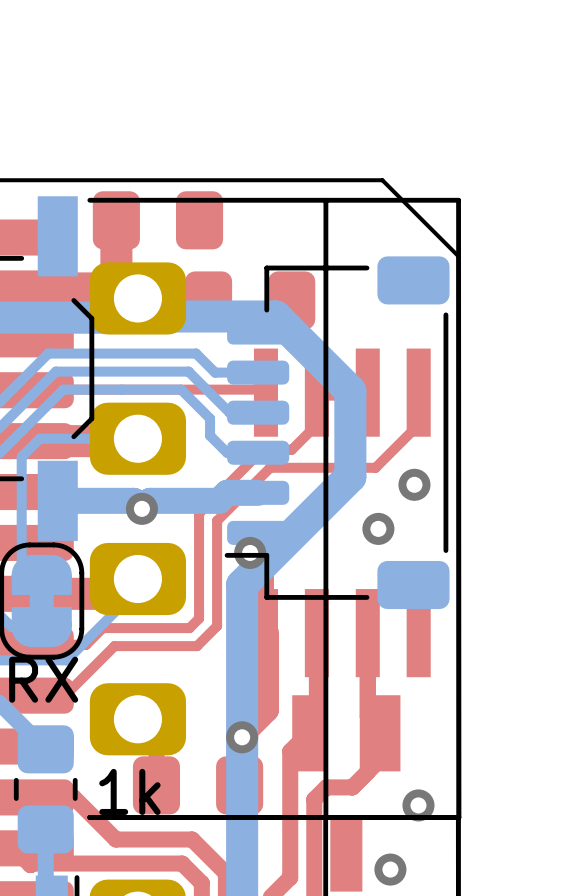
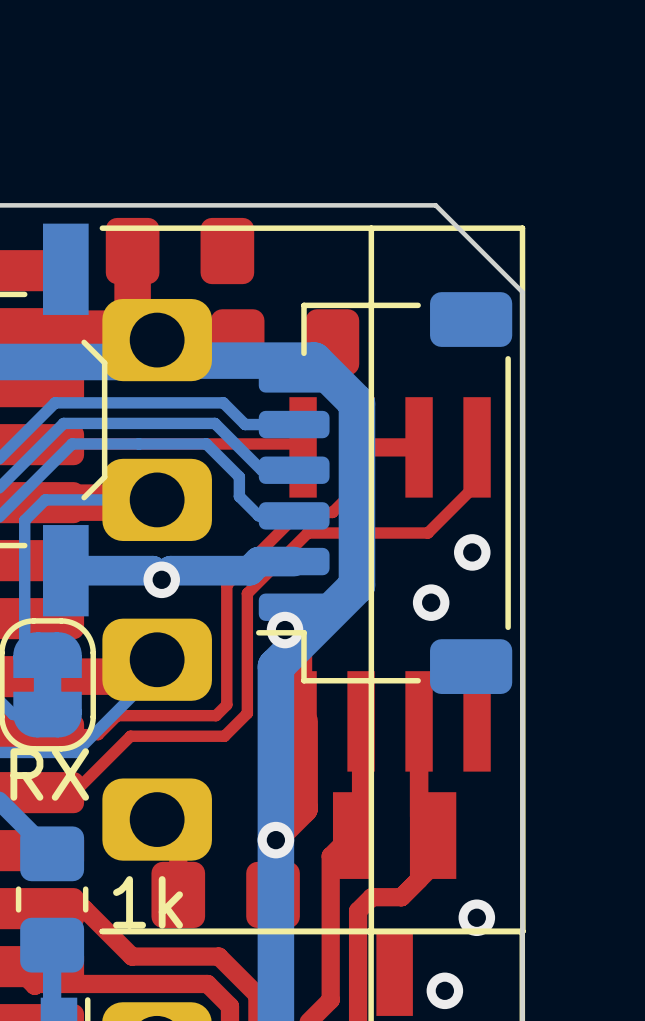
bottom track: (313, 353) (350, 391) (350, 476) (313, 513) -> (356, 403) (356, 585)

